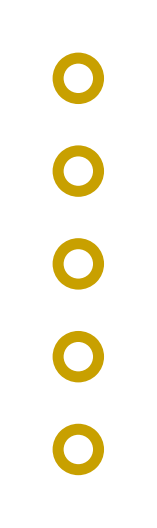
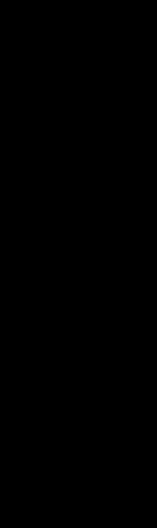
part: (78, 78) -> none
part: (78, 171) -> none
part: (78, 263) -> none
part: (78, 356) -> none
part: (78, 449) -> none

